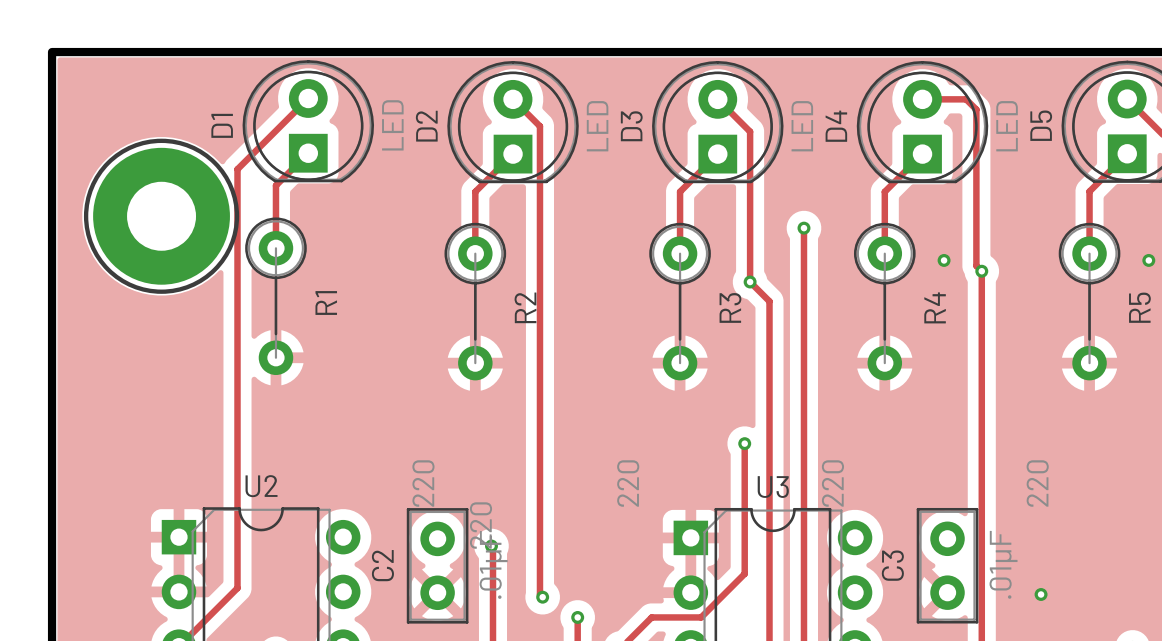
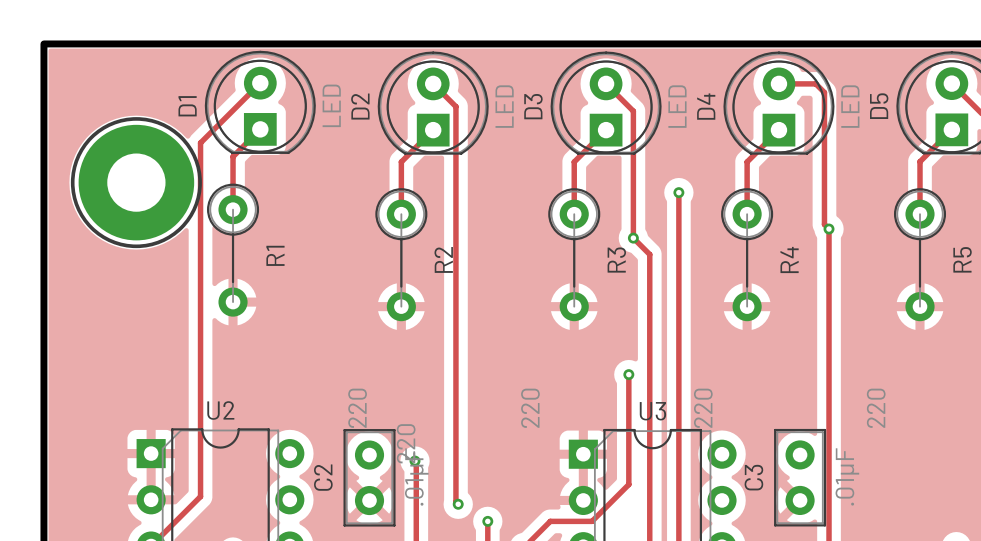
via: (944, 260) -> none
via: (1148, 260) -> none
via: (1041, 594) -> none

